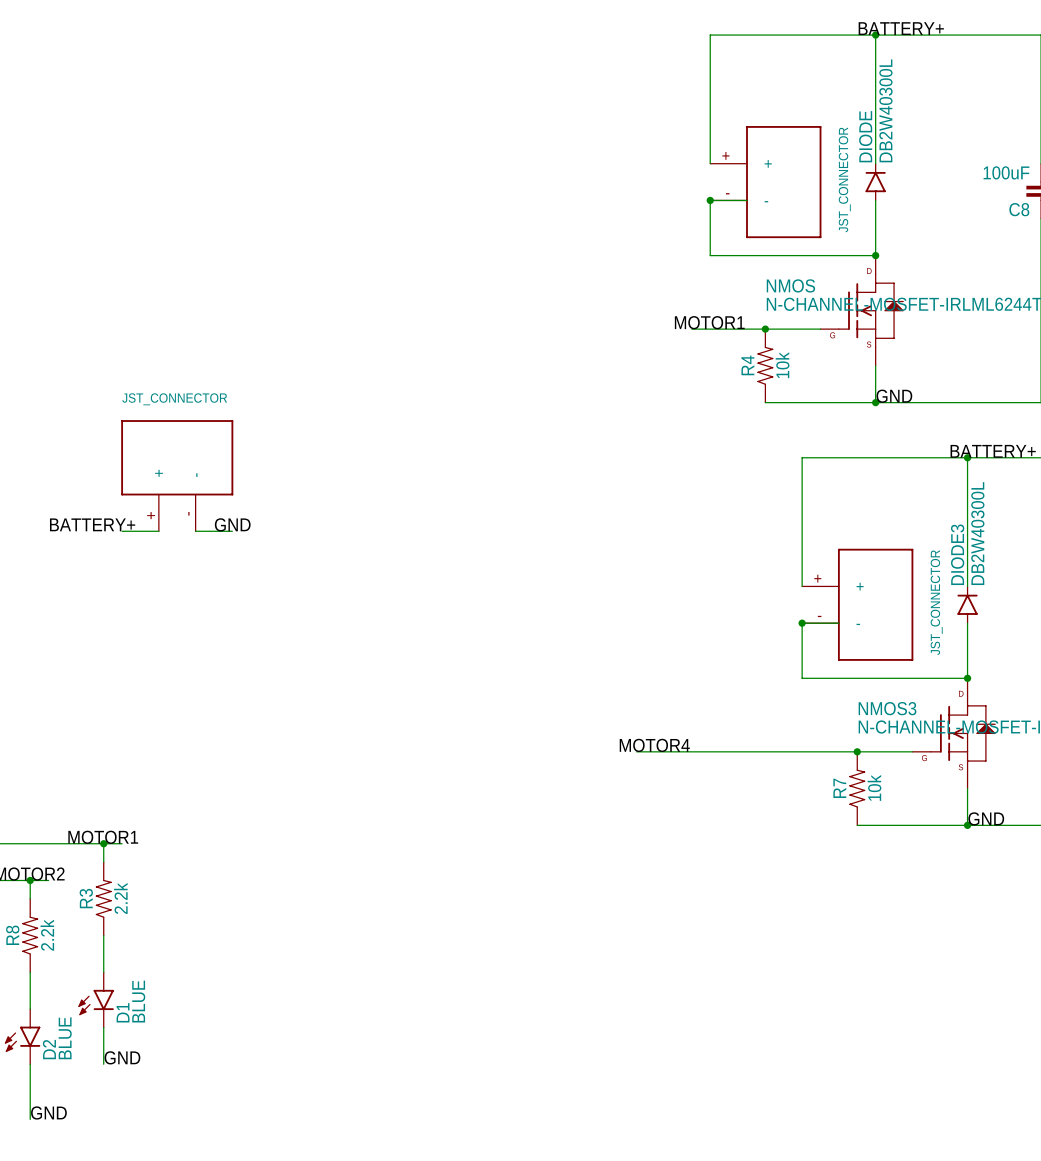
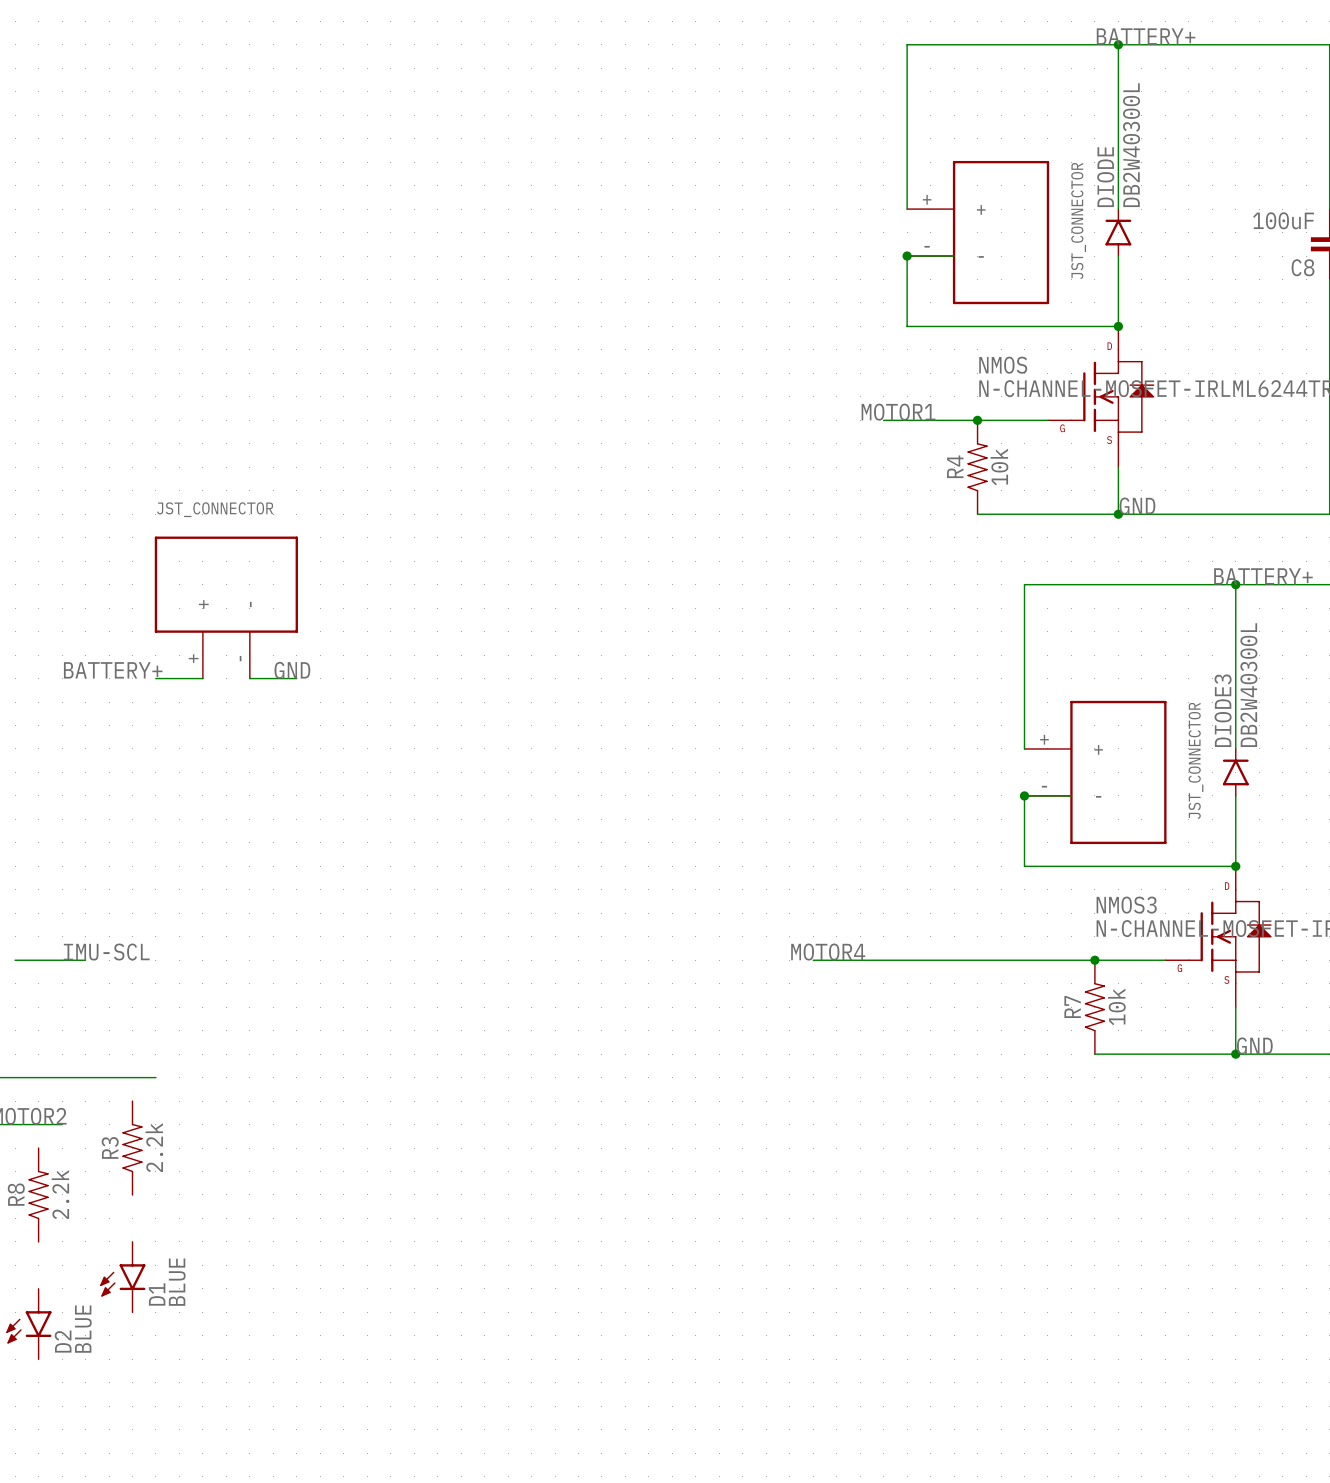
label: none -> IMU-SCL (106, 952)
wire: none -> (15, 960) (85, 960)
label: MOTOR1 (103, 837) -> none
wire: (103, 843) (103, 862) -> none
junction: (103, 843) -> none
wire: (30, 880) (30, 898) -> none
junction: (30, 880) -> none
wire: (103, 935) (103, 972) -> none
wire: (30, 972) (30, 1009) -> none
wire: (103, 1027) (103, 1064) -> none
label: GND (122, 1057) -> none
wire: (30, 1064) (30, 1119) -> none
label: GND (48, 1112) -> none

